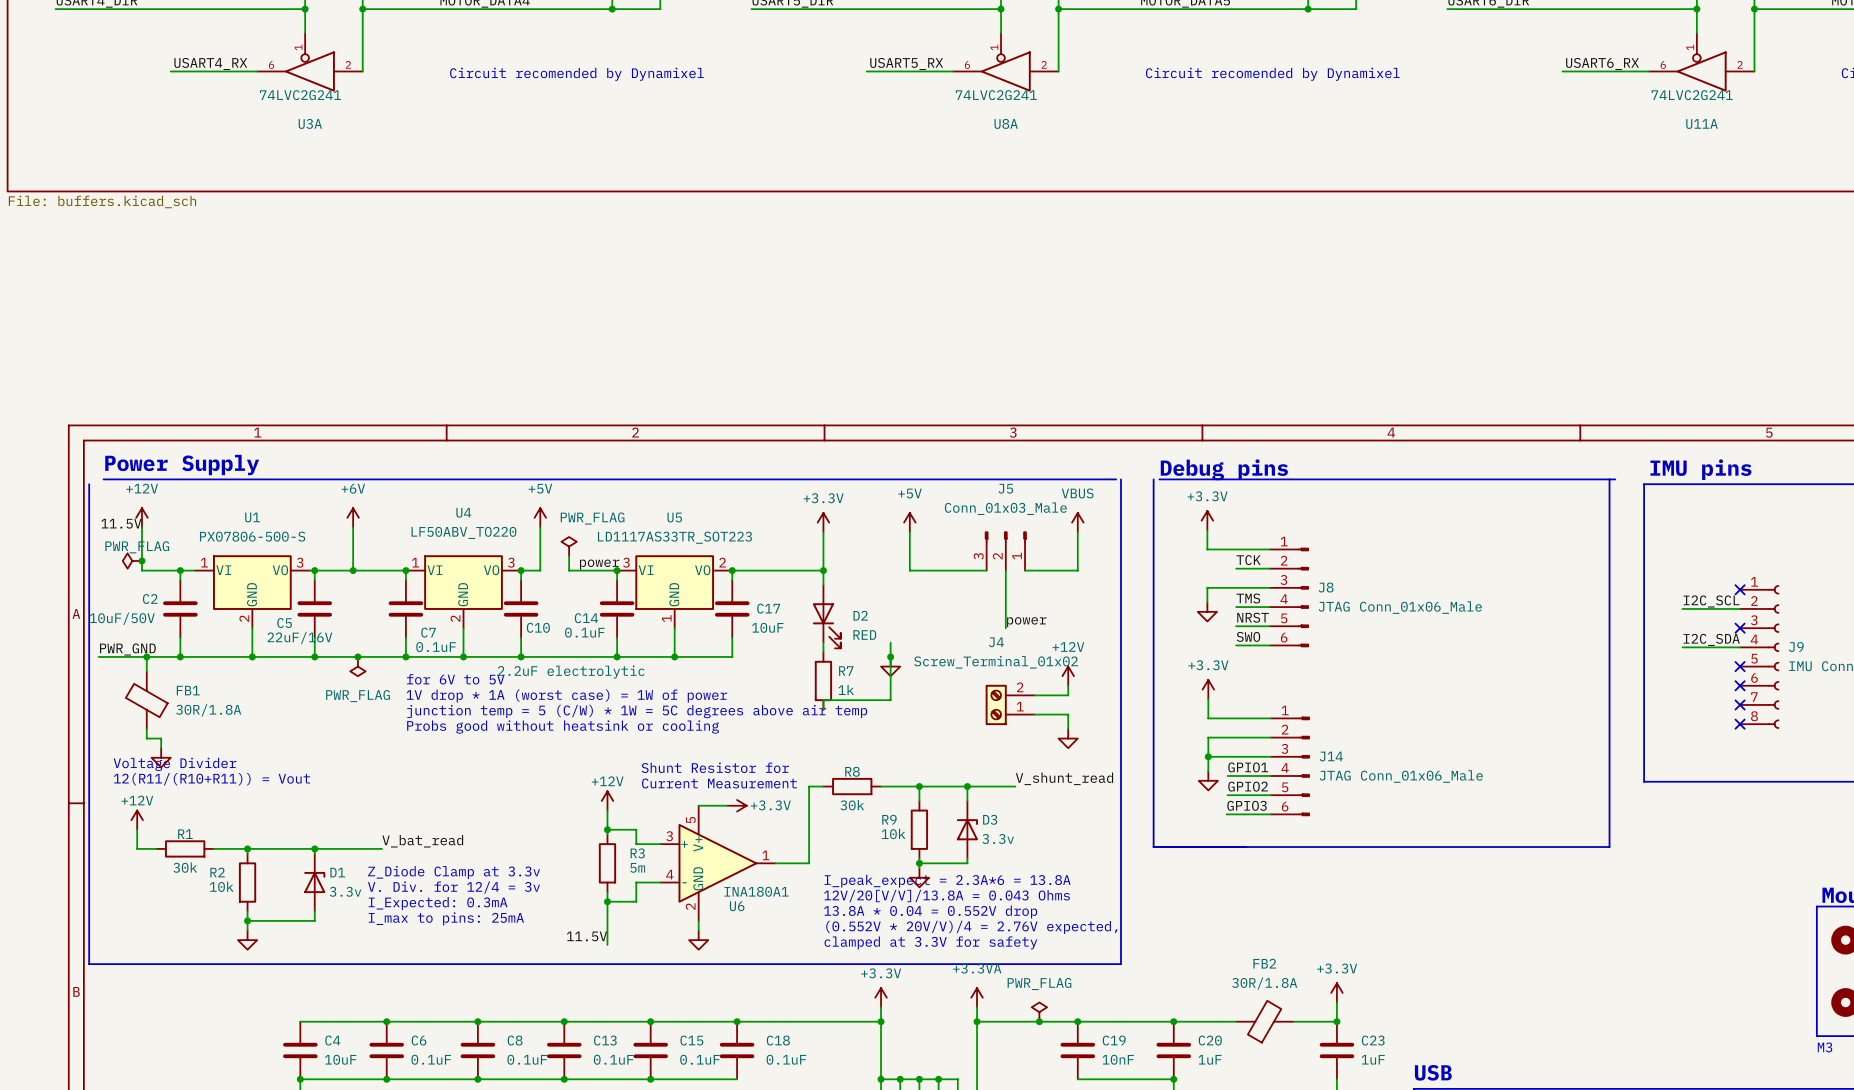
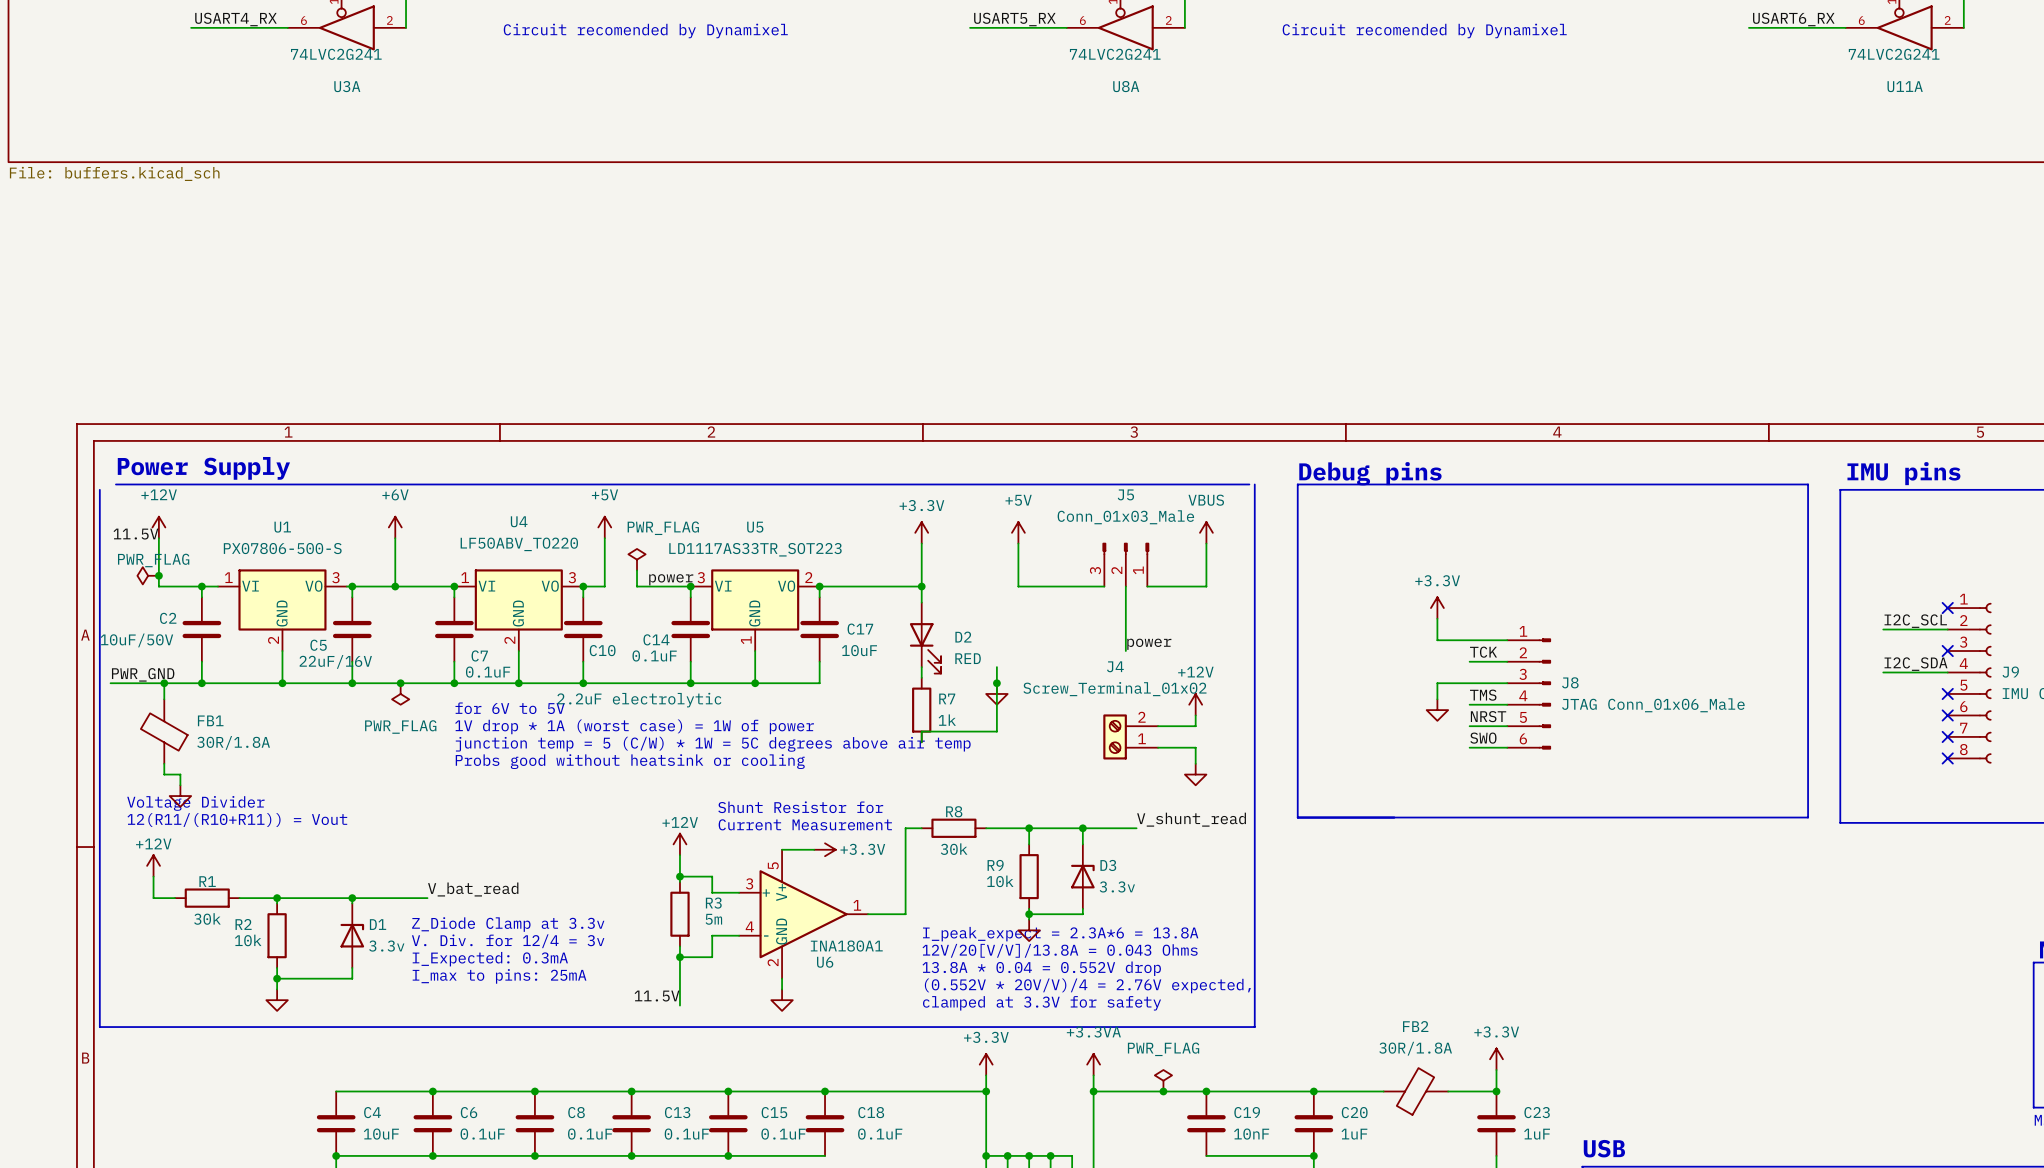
line: (1153, 479) (1153, 847) (1609, 847) (1609, 479) -> none
line: none -> (1297, 484) (1297, 817) (1808, 817) (1808, 484)
power symbol: +3.3V (1207, 520) -> none
wire: (1207, 530) (1207, 549) (1269, 549) -> (1437, 618) (1437, 640) (1507, 640)
label position: TCK (1248, 560) -> TCK (1483, 652)
wire: (1236, 568) (1269, 568) -> (1469, 661) (1507, 661)
wire: (1269, 587) (1207, 587) (1207, 602) -> (1507, 683) (1437, 683) (1437, 699)
power symbol: none -> +3.3V (1437, 608)
J8 position: (1289, 597) -> (1529, 693)
label position: TMS (1248, 598) -> TMS (1483, 695)
wire: (1236, 607) (1269, 607) -> (1469, 704) (1507, 704)
power symbol: (1207, 611) -> none
label position: NRST (1253, 617) -> NRST (1488, 716)
wire: (1236, 626) (1269, 626) -> (1469, 726) (1507, 726)
label position: SWO (1248, 636) -> SWO (1483, 738)
wire: (1236, 645) (1269, 645) -> (1469, 747) (1507, 747)
power symbol: none -> (1437, 710)
power symbol: +3.3V (1208, 689) -> none
wire: (1208, 699) (1208, 718) (1270, 718) -> none
wire: (1270, 737) (1208, 737) (1208, 771) -> none
wire: (1208, 756) (1270, 756) -> none
junction: (1208, 756) -> none
J14: JTAG Conn_01x06_Male (1290, 766) -> none
label: GPIO1 (1248, 767) -> none
wire: (1227, 775) (1270, 775) -> none
power symbol: (1208, 780) -> none
label: GPIO2 (1248, 786) -> none
wire: (1227, 795) (1270, 795) -> none
label: GPIO3 (1247, 805) -> none
wire: (1226, 814) (1270, 814) -> none

